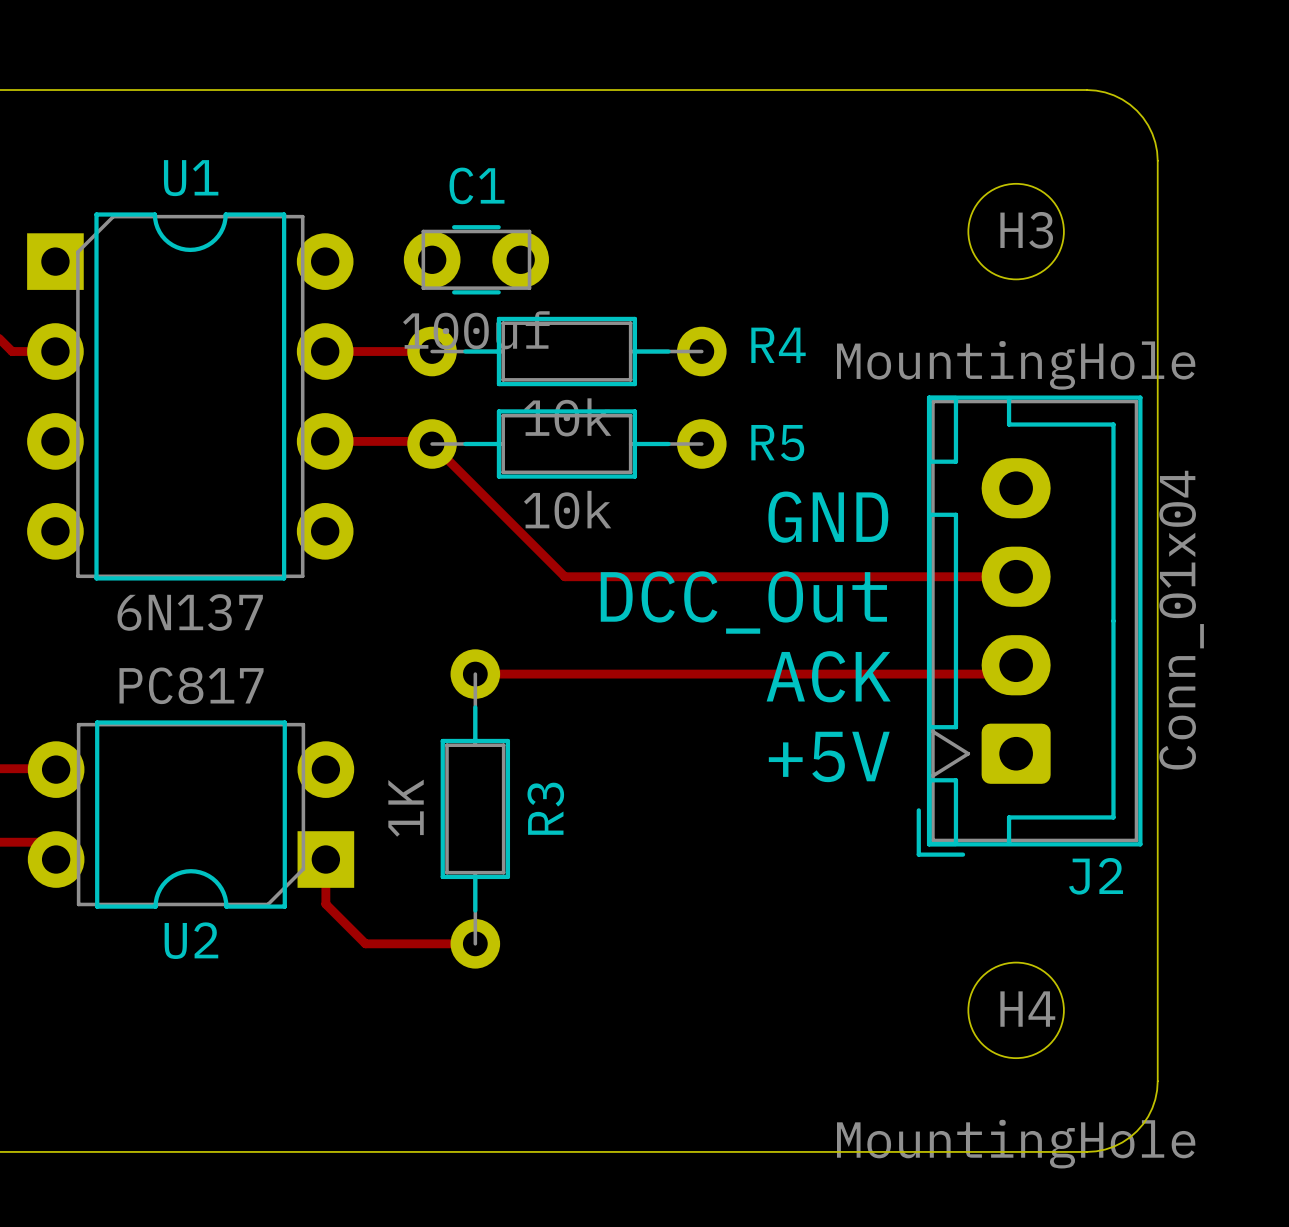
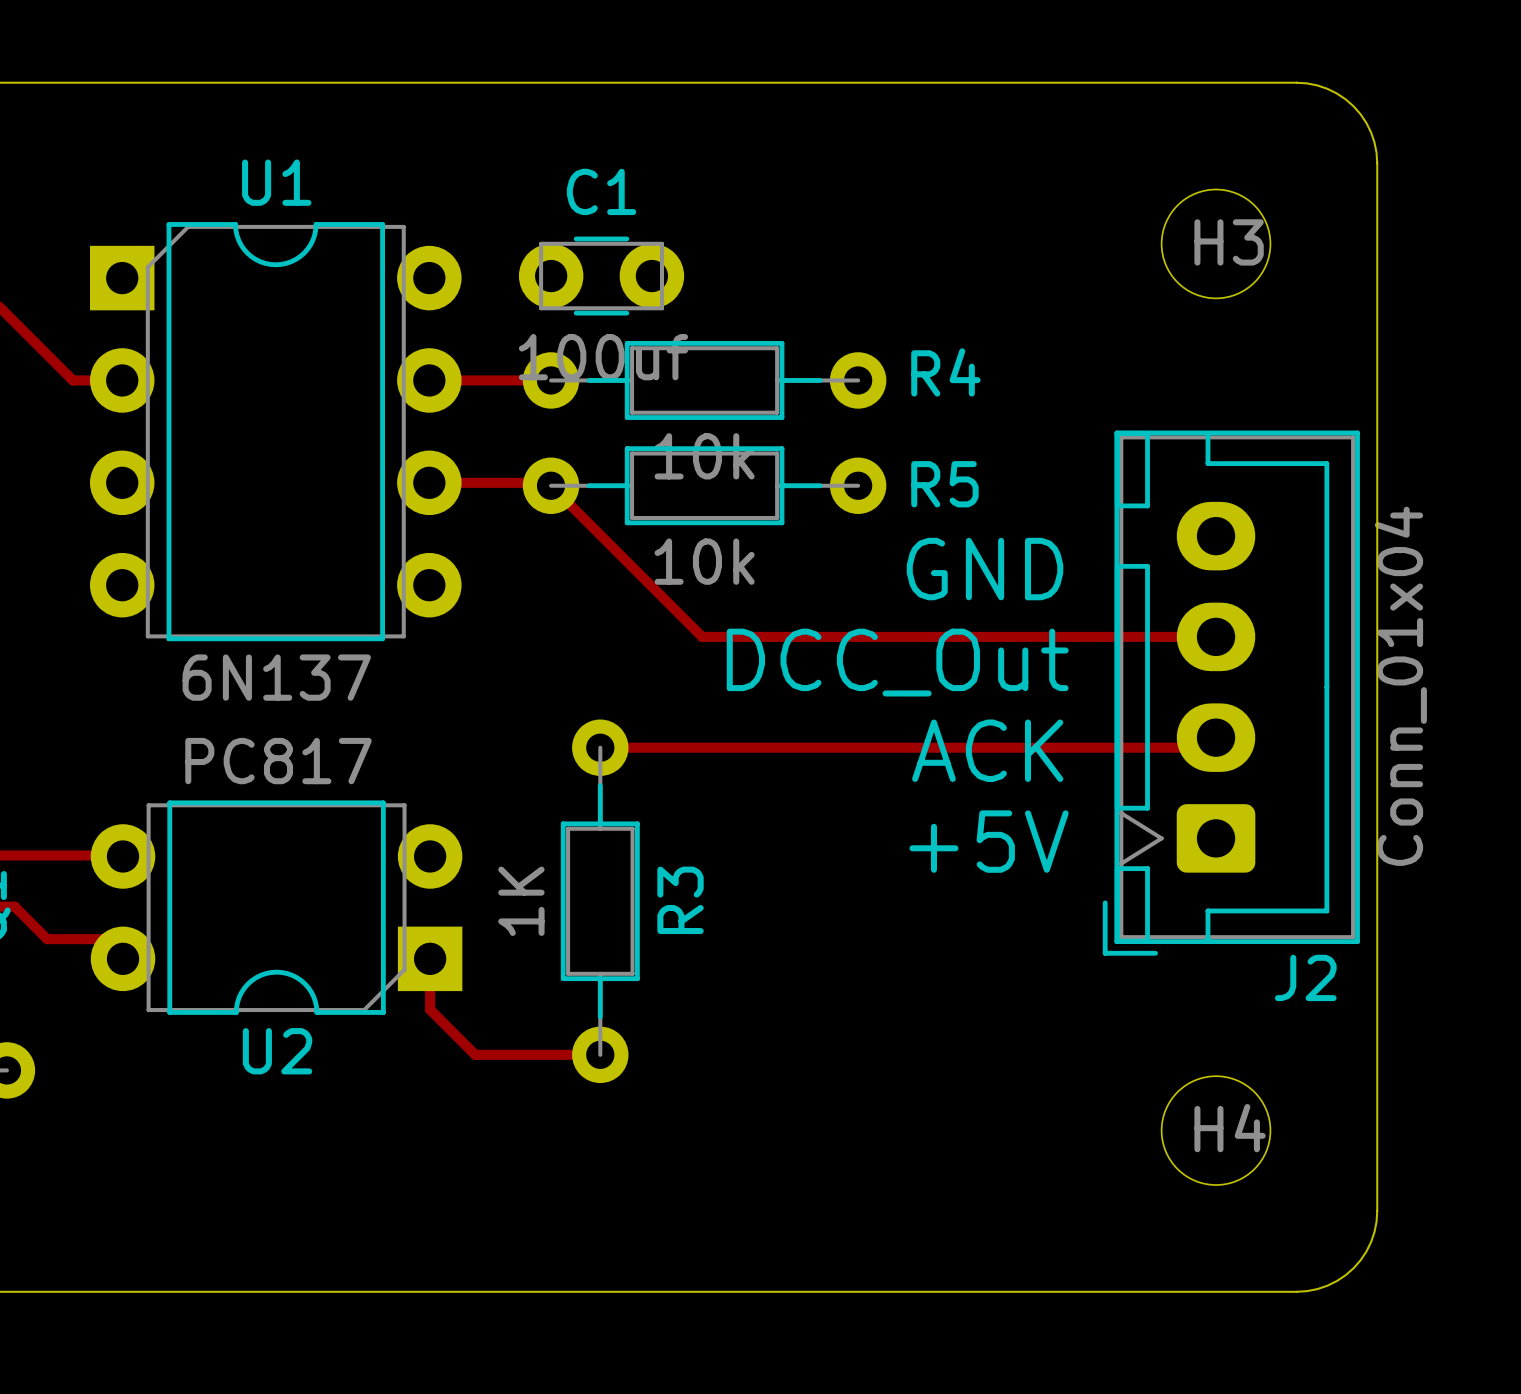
H3 value: MountingHole (1016, 365) -> none
H4 value: MountingHole (1016, 1144) -> none

